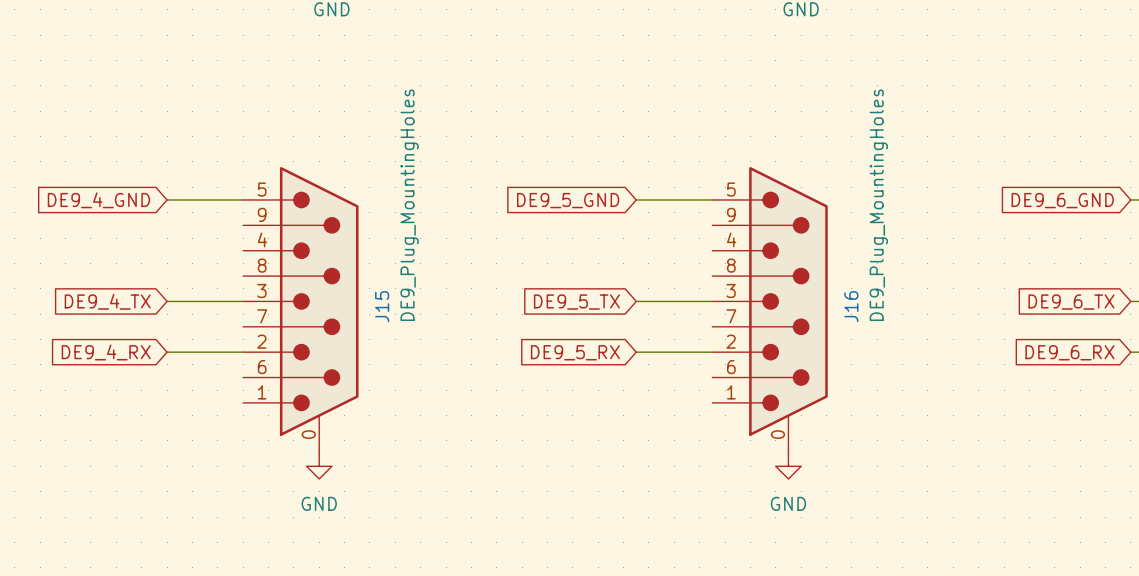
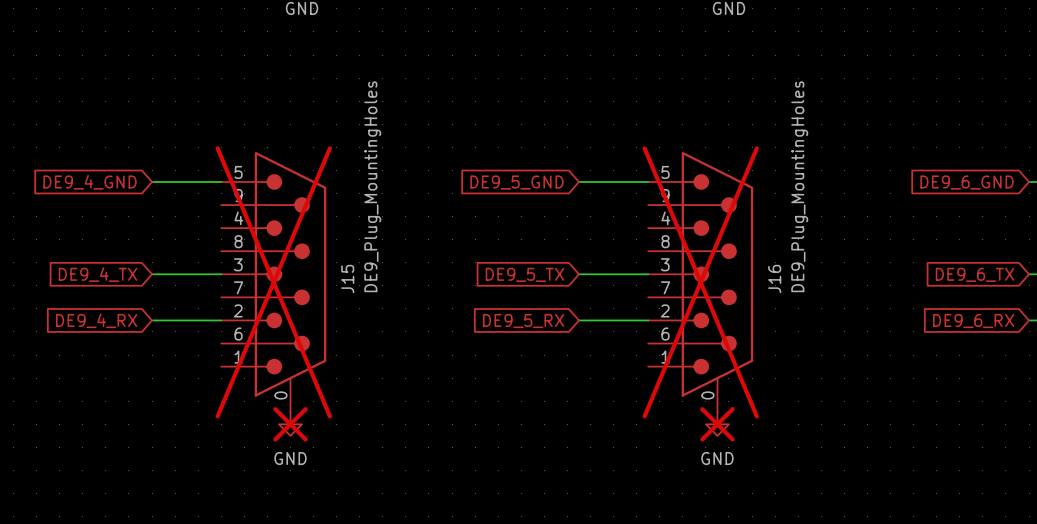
J15 do-not-place cross: none -> (273, 282)
J16 do-not-place cross: none -> (700, 282)
power symbol do-not-place cross: none -> (290, 424)
power symbol do-not-place cross: none -> (717, 424)

